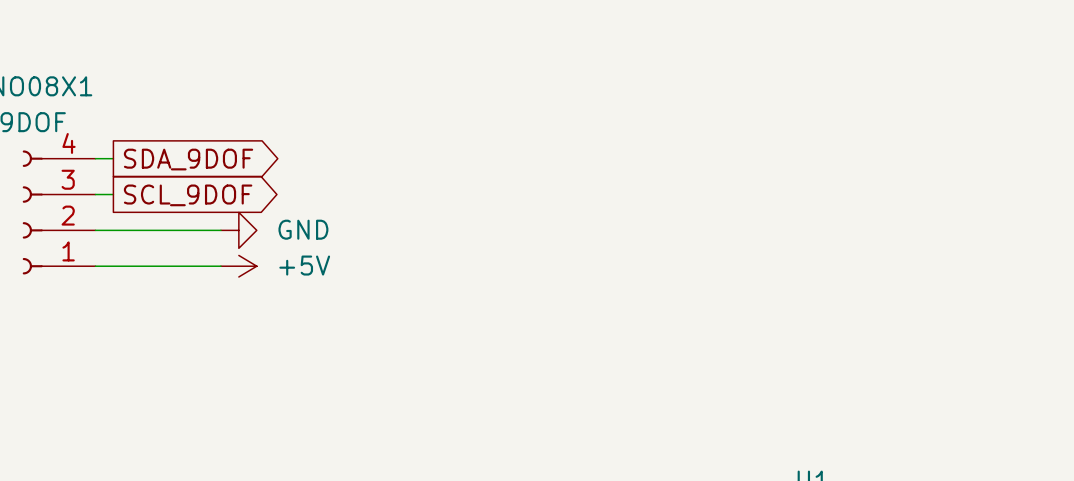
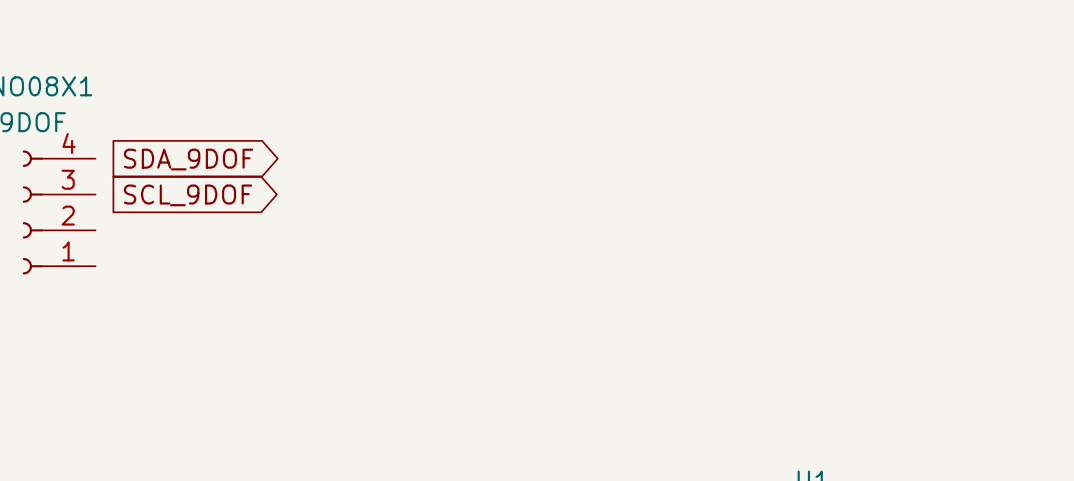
wire: (95, 158) (113, 158) -> none
wire: (95, 194) (113, 194) -> none
wire: (95, 230) (220, 230) -> none
power symbol: GND (238, 230) -> none
wire: (95, 266) (220, 266) -> none
power symbol: +5V (238, 266) -> none

